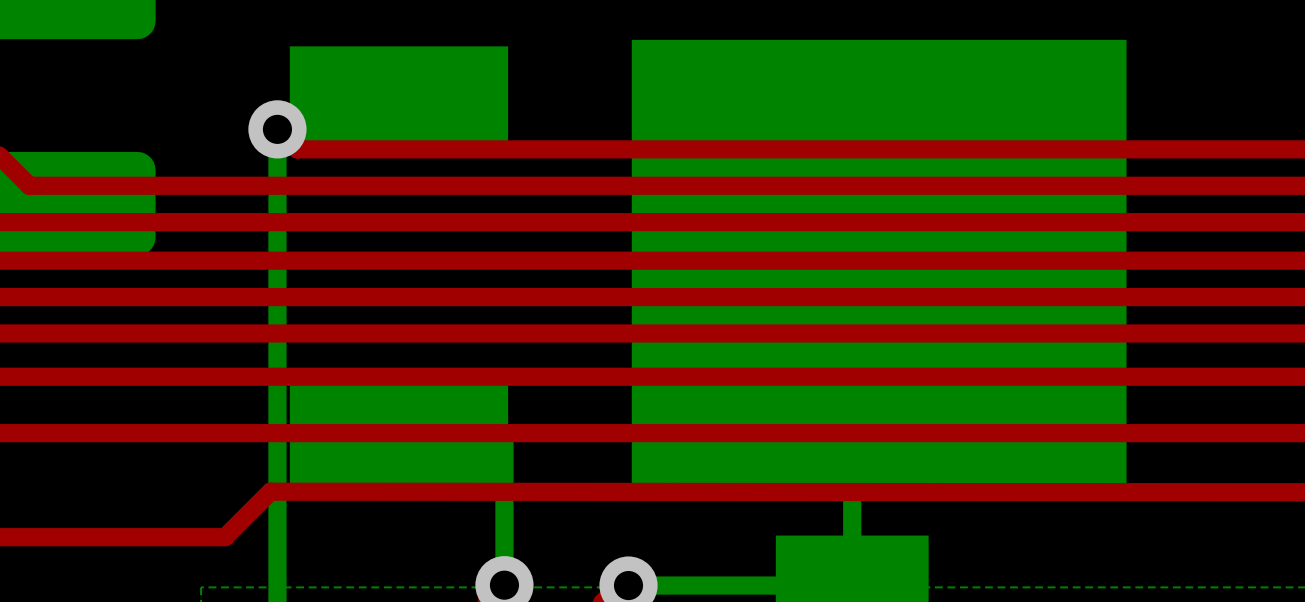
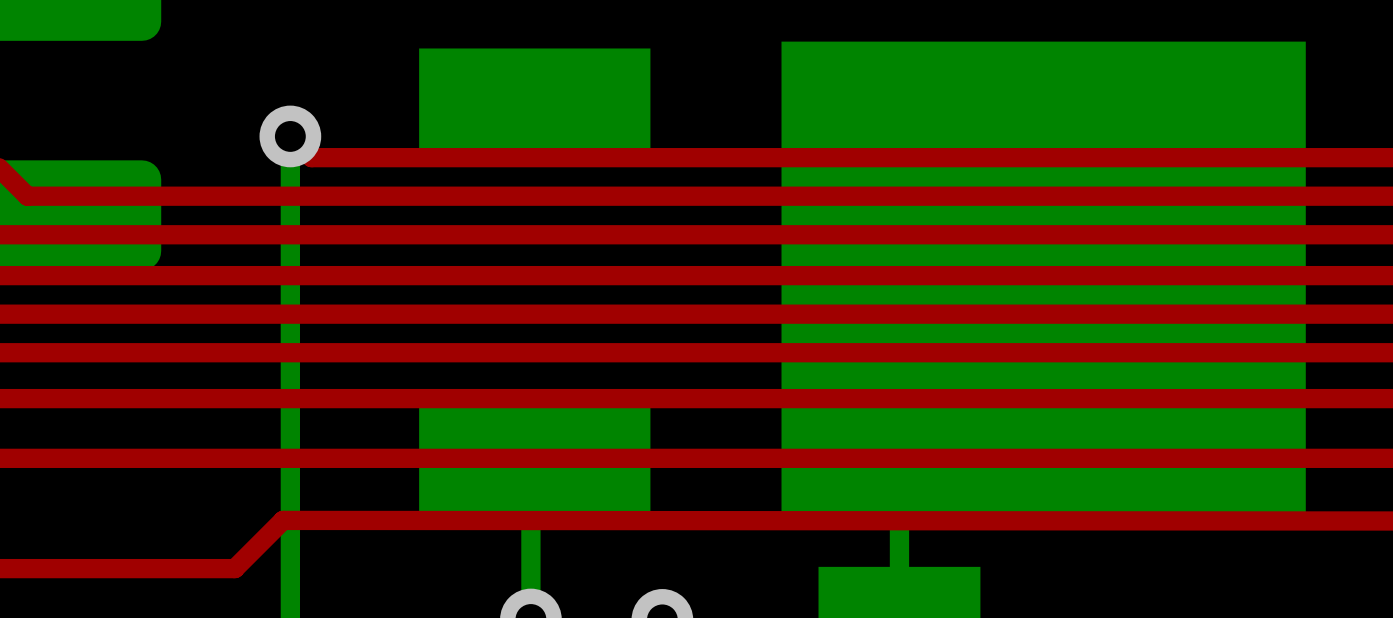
part position: (708, 267) -> (862, 282)

